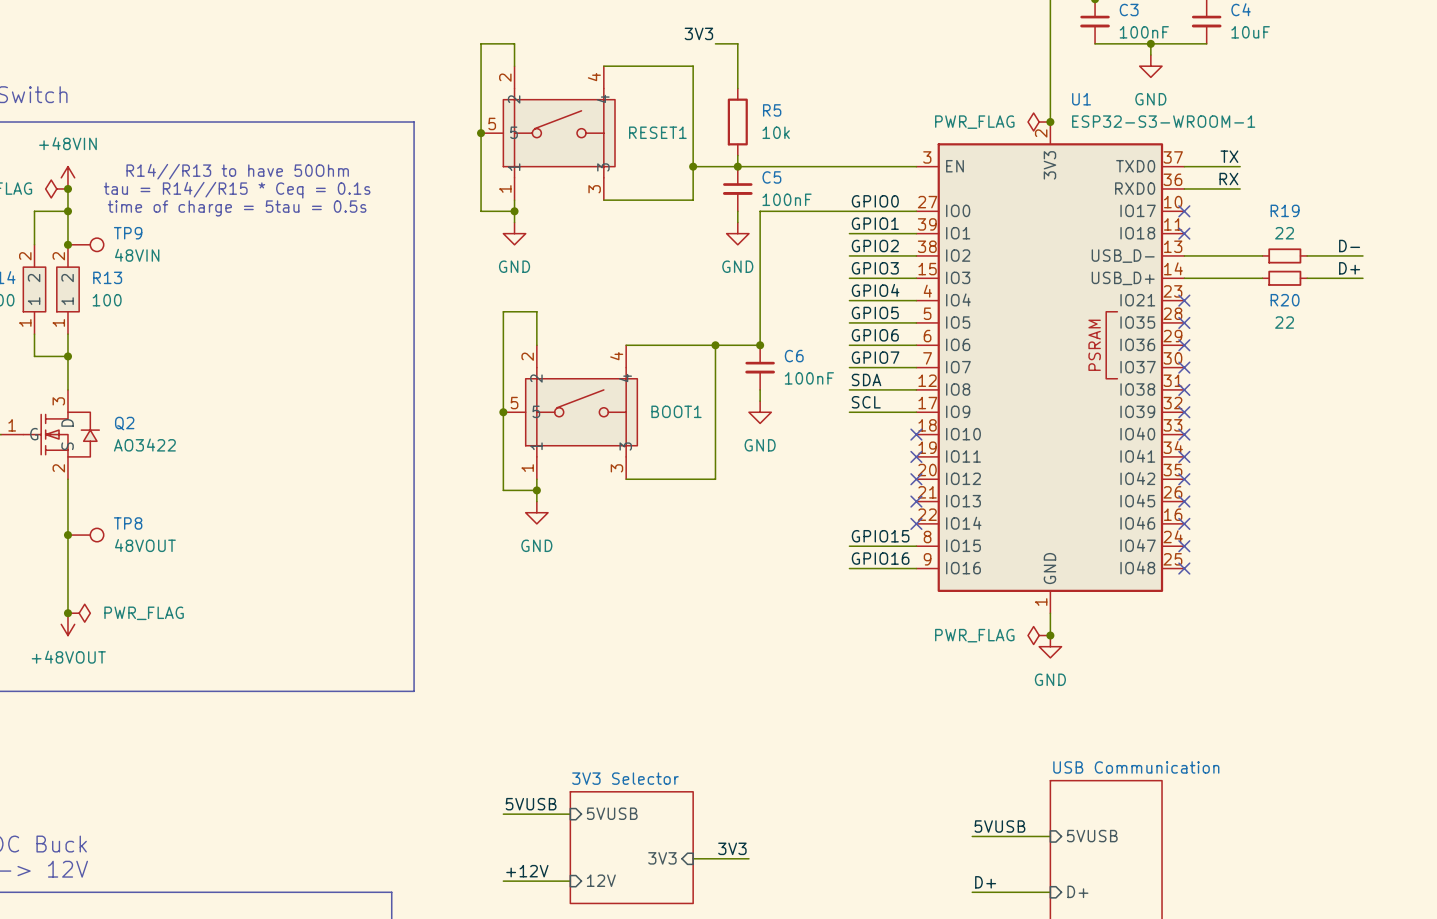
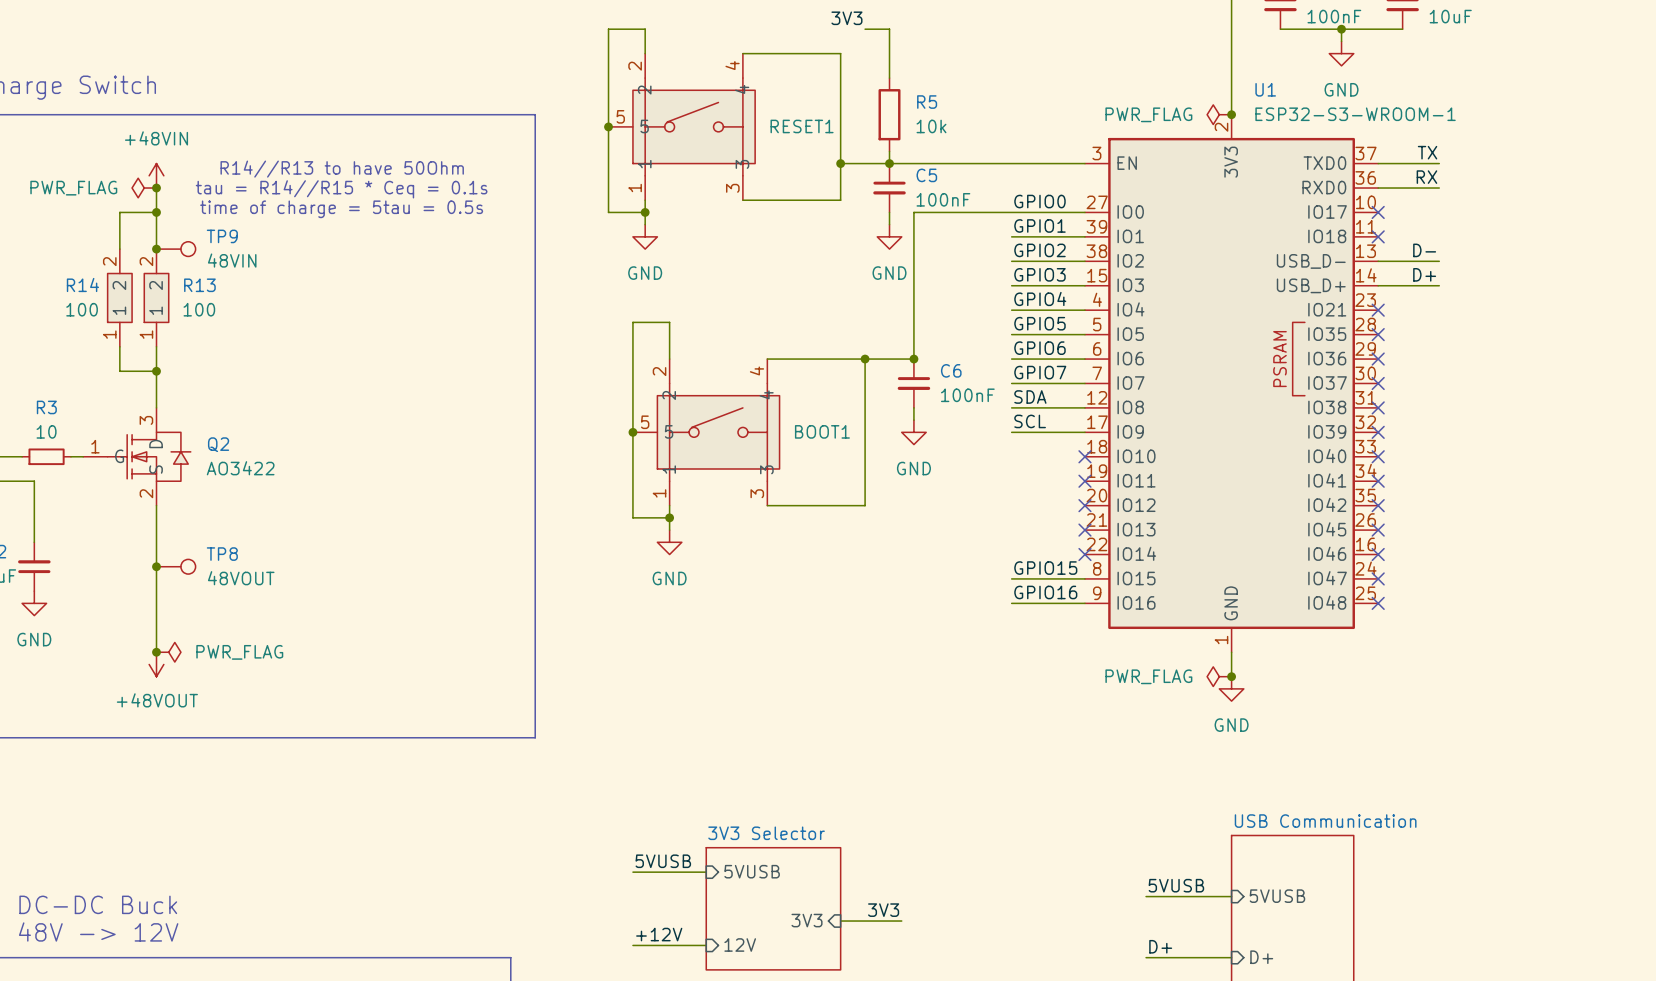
label position: D- (1349, 246) -> D- (1424, 250)
wire: (1240, 255) (1262, 255) -> none
R19: 22 (1284, 255) -> none
wire: (1307, 255) (1362, 255) -> none
label position: D+ (1349, 268) -> D+ (1424, 274)
wire: (1240, 278) (1262, 278) -> none
R20: 22 (1284, 278) -> none
wire: (1307, 278) (1362, 278) -> none

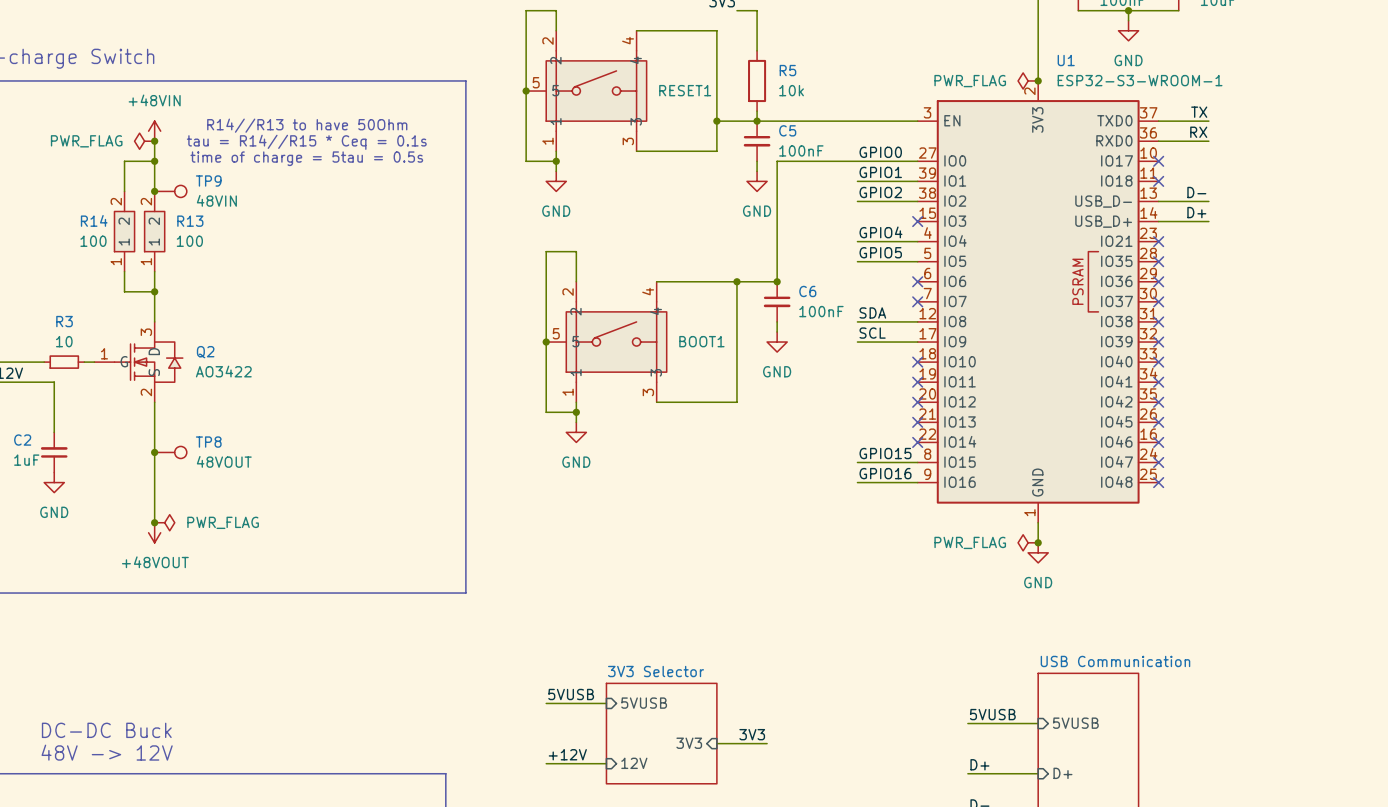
label: GPIO3 (1039, 274) -> none
wire: (1011, 285) (1084, 285) -> none
no-connect mark: none -> (917, 221)
label: GPIO6 (1039, 348) -> none
wire: (1011, 359) (1084, 359) -> none
no-connect mark: none -> (917, 281)
label: GPIO7 (1040, 372) -> none
wire: (1011, 383) (1084, 383) -> none
no-connect mark: none -> (917, 301)

